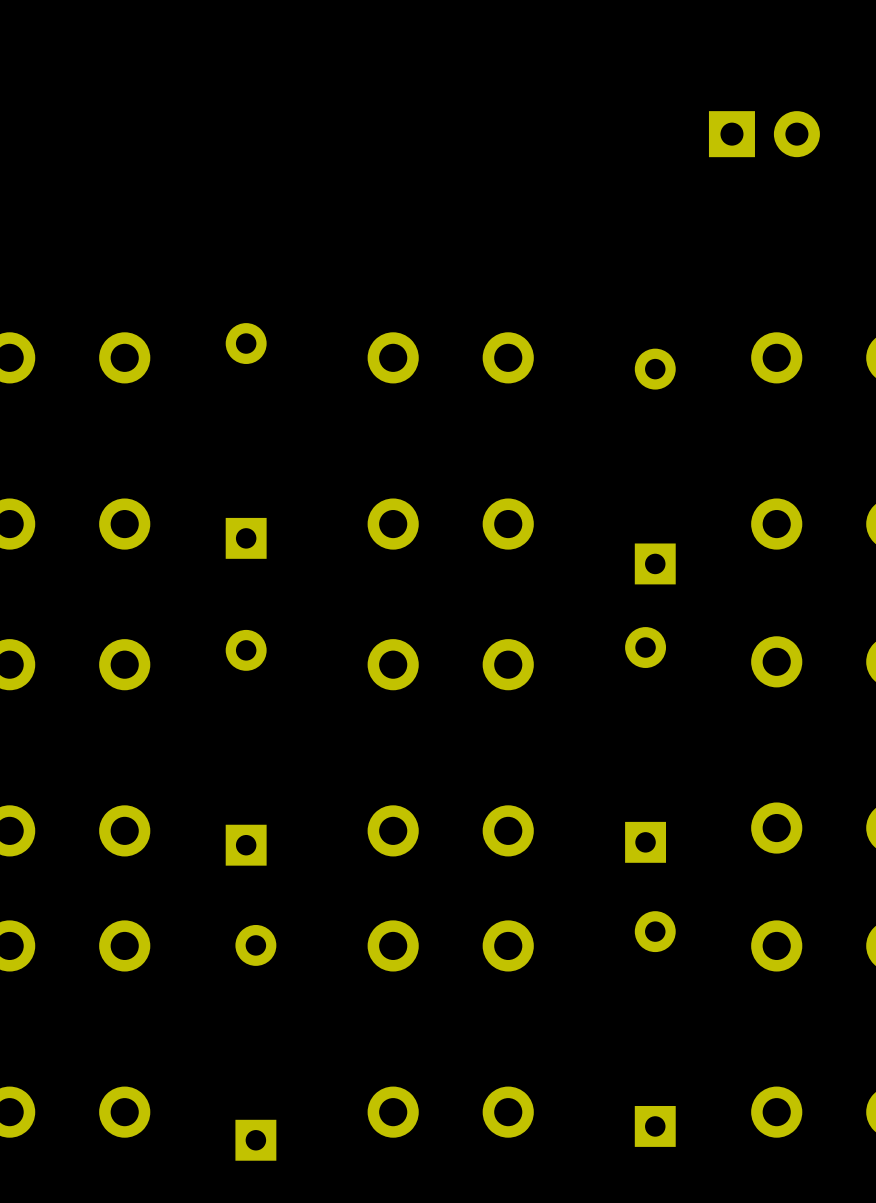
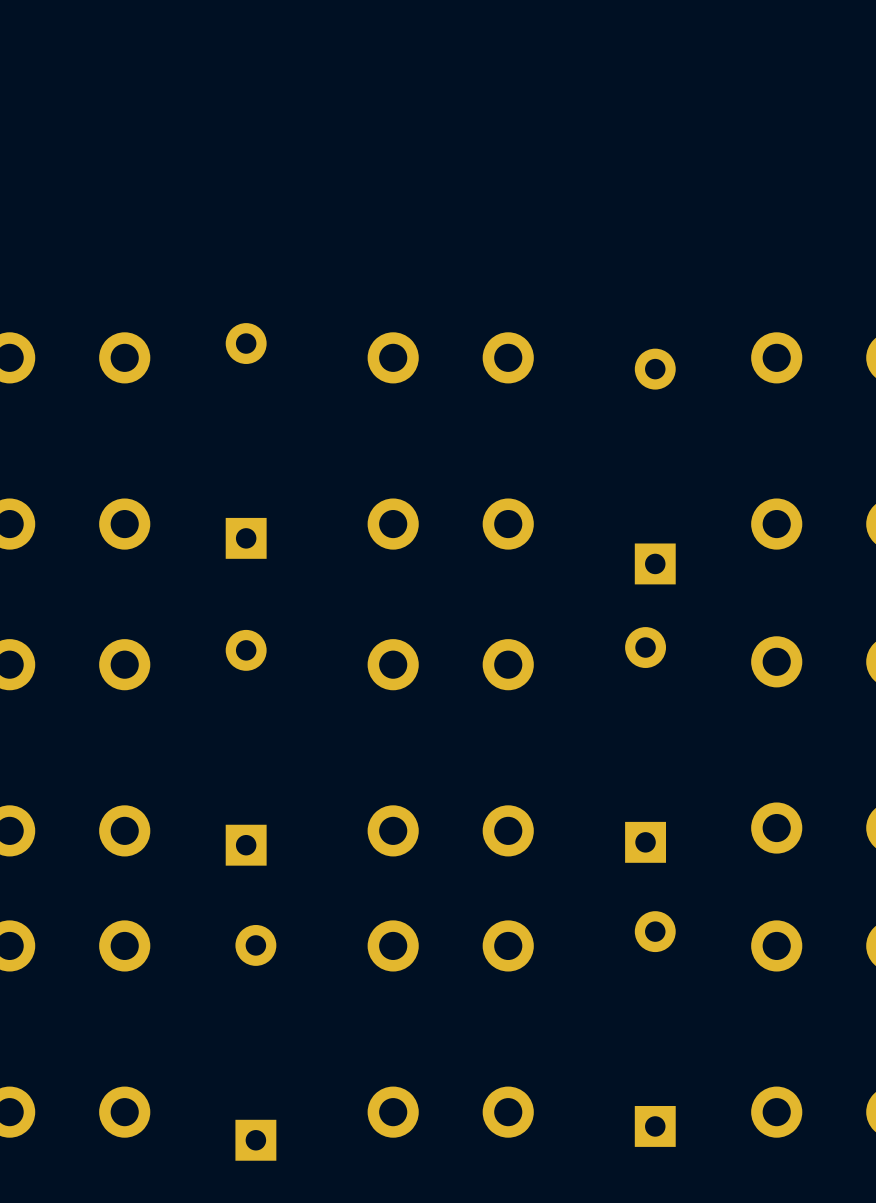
part: (764, 134) -> none

